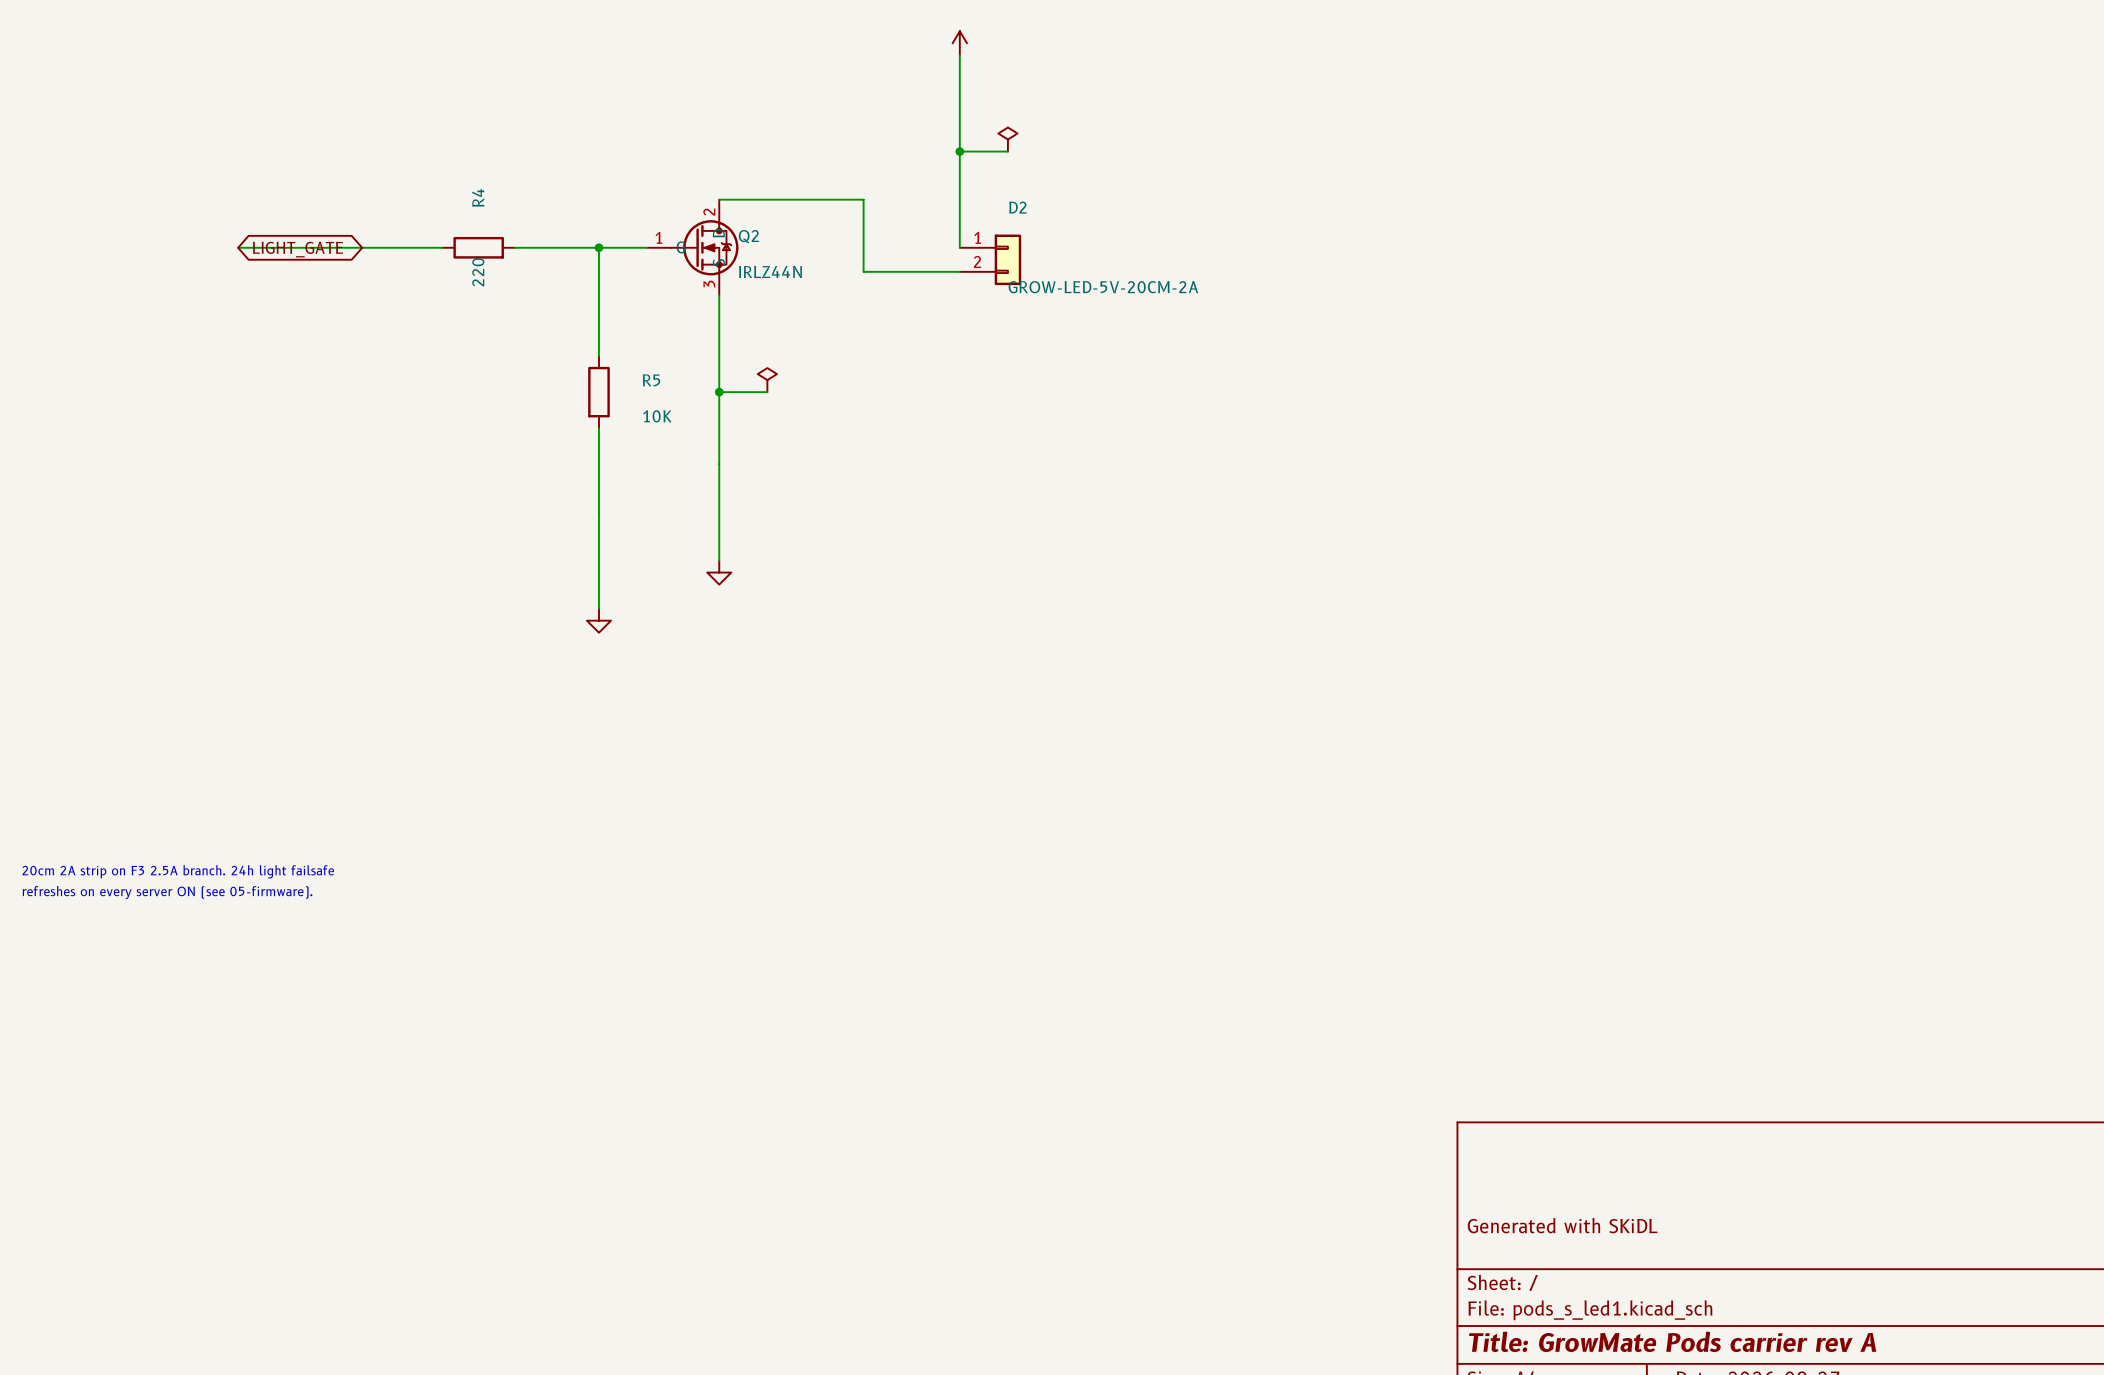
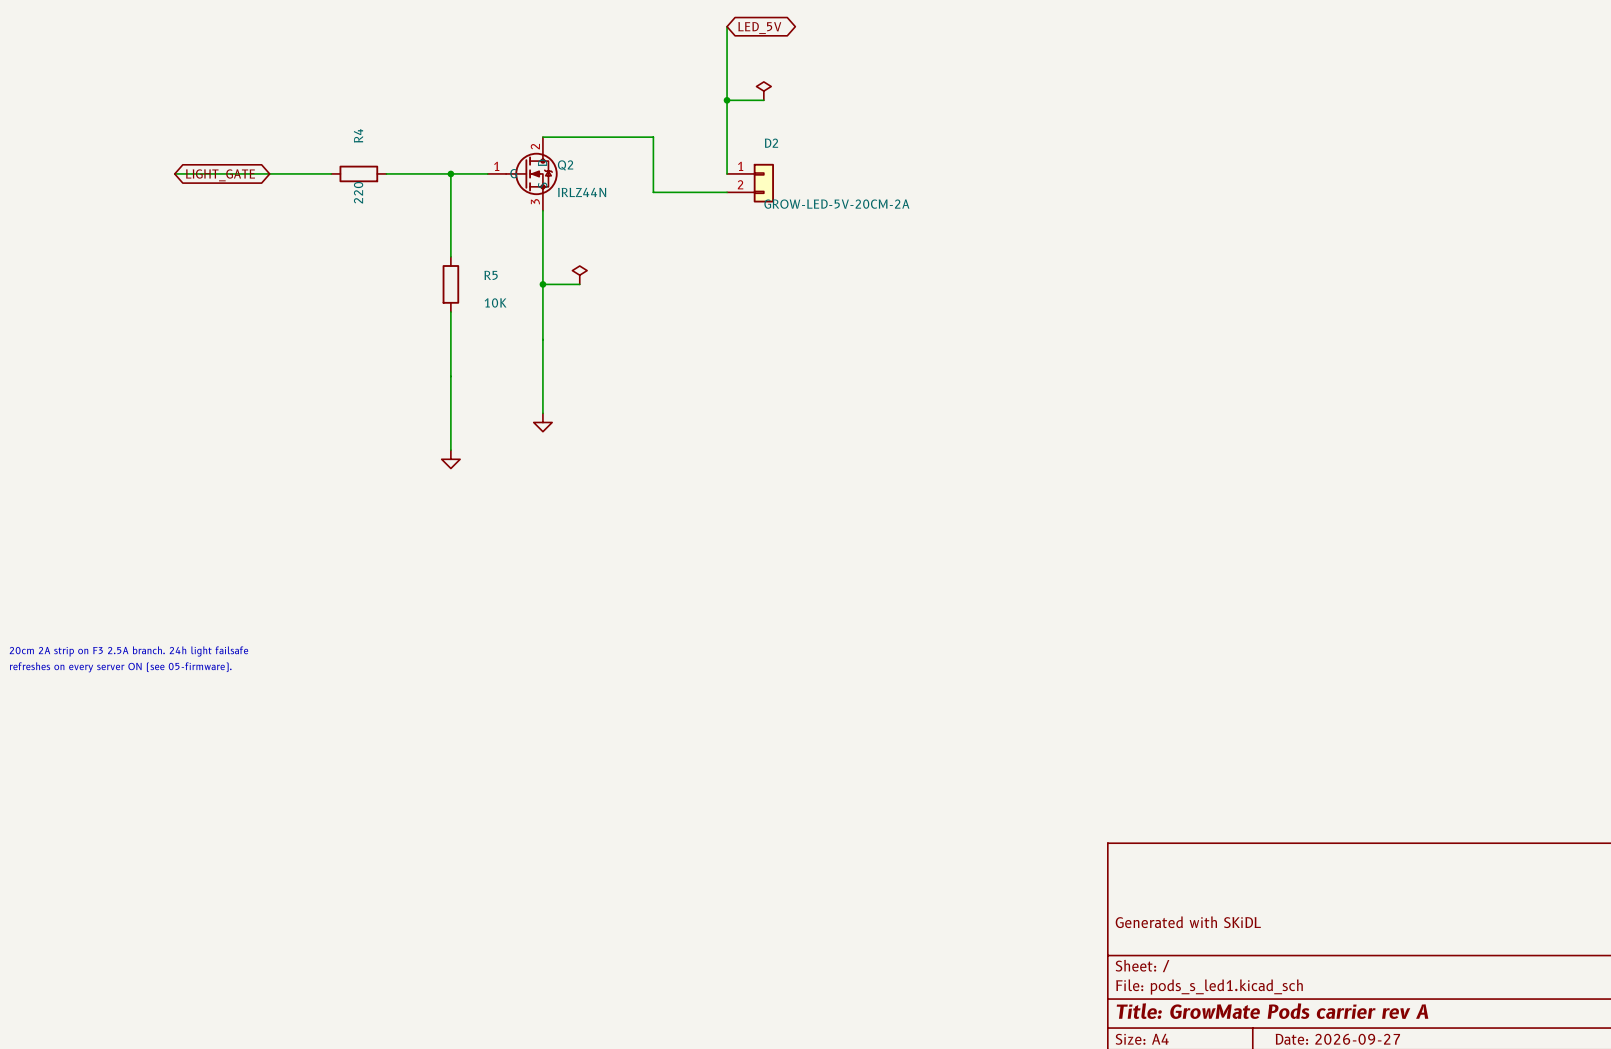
power symbol: (959, 43) -> none
global label: none -> LED_5V (759, 28)

